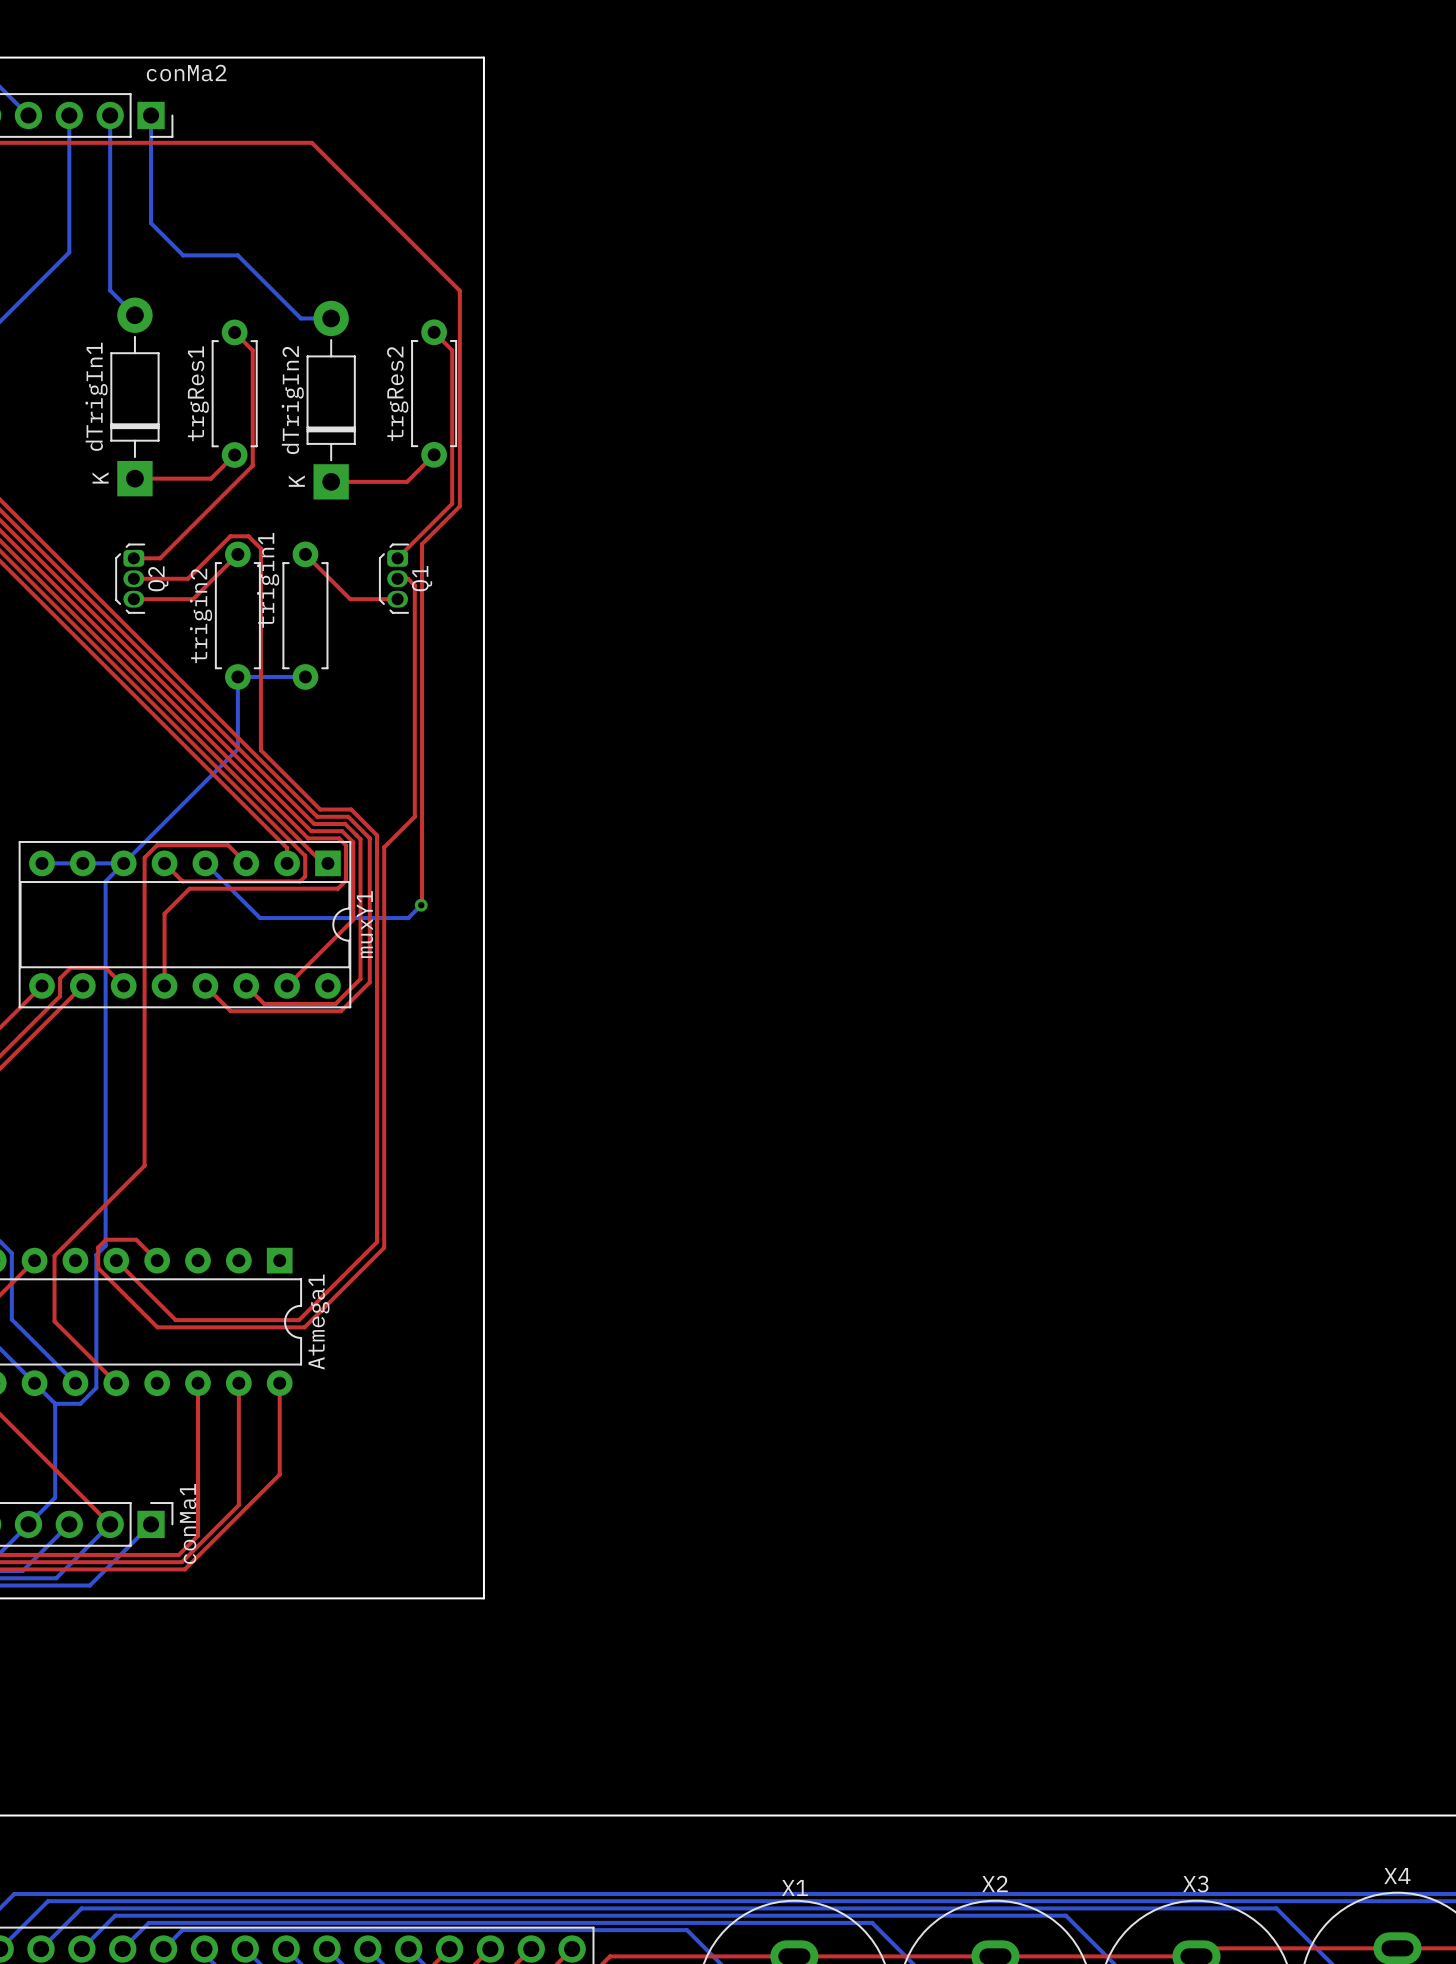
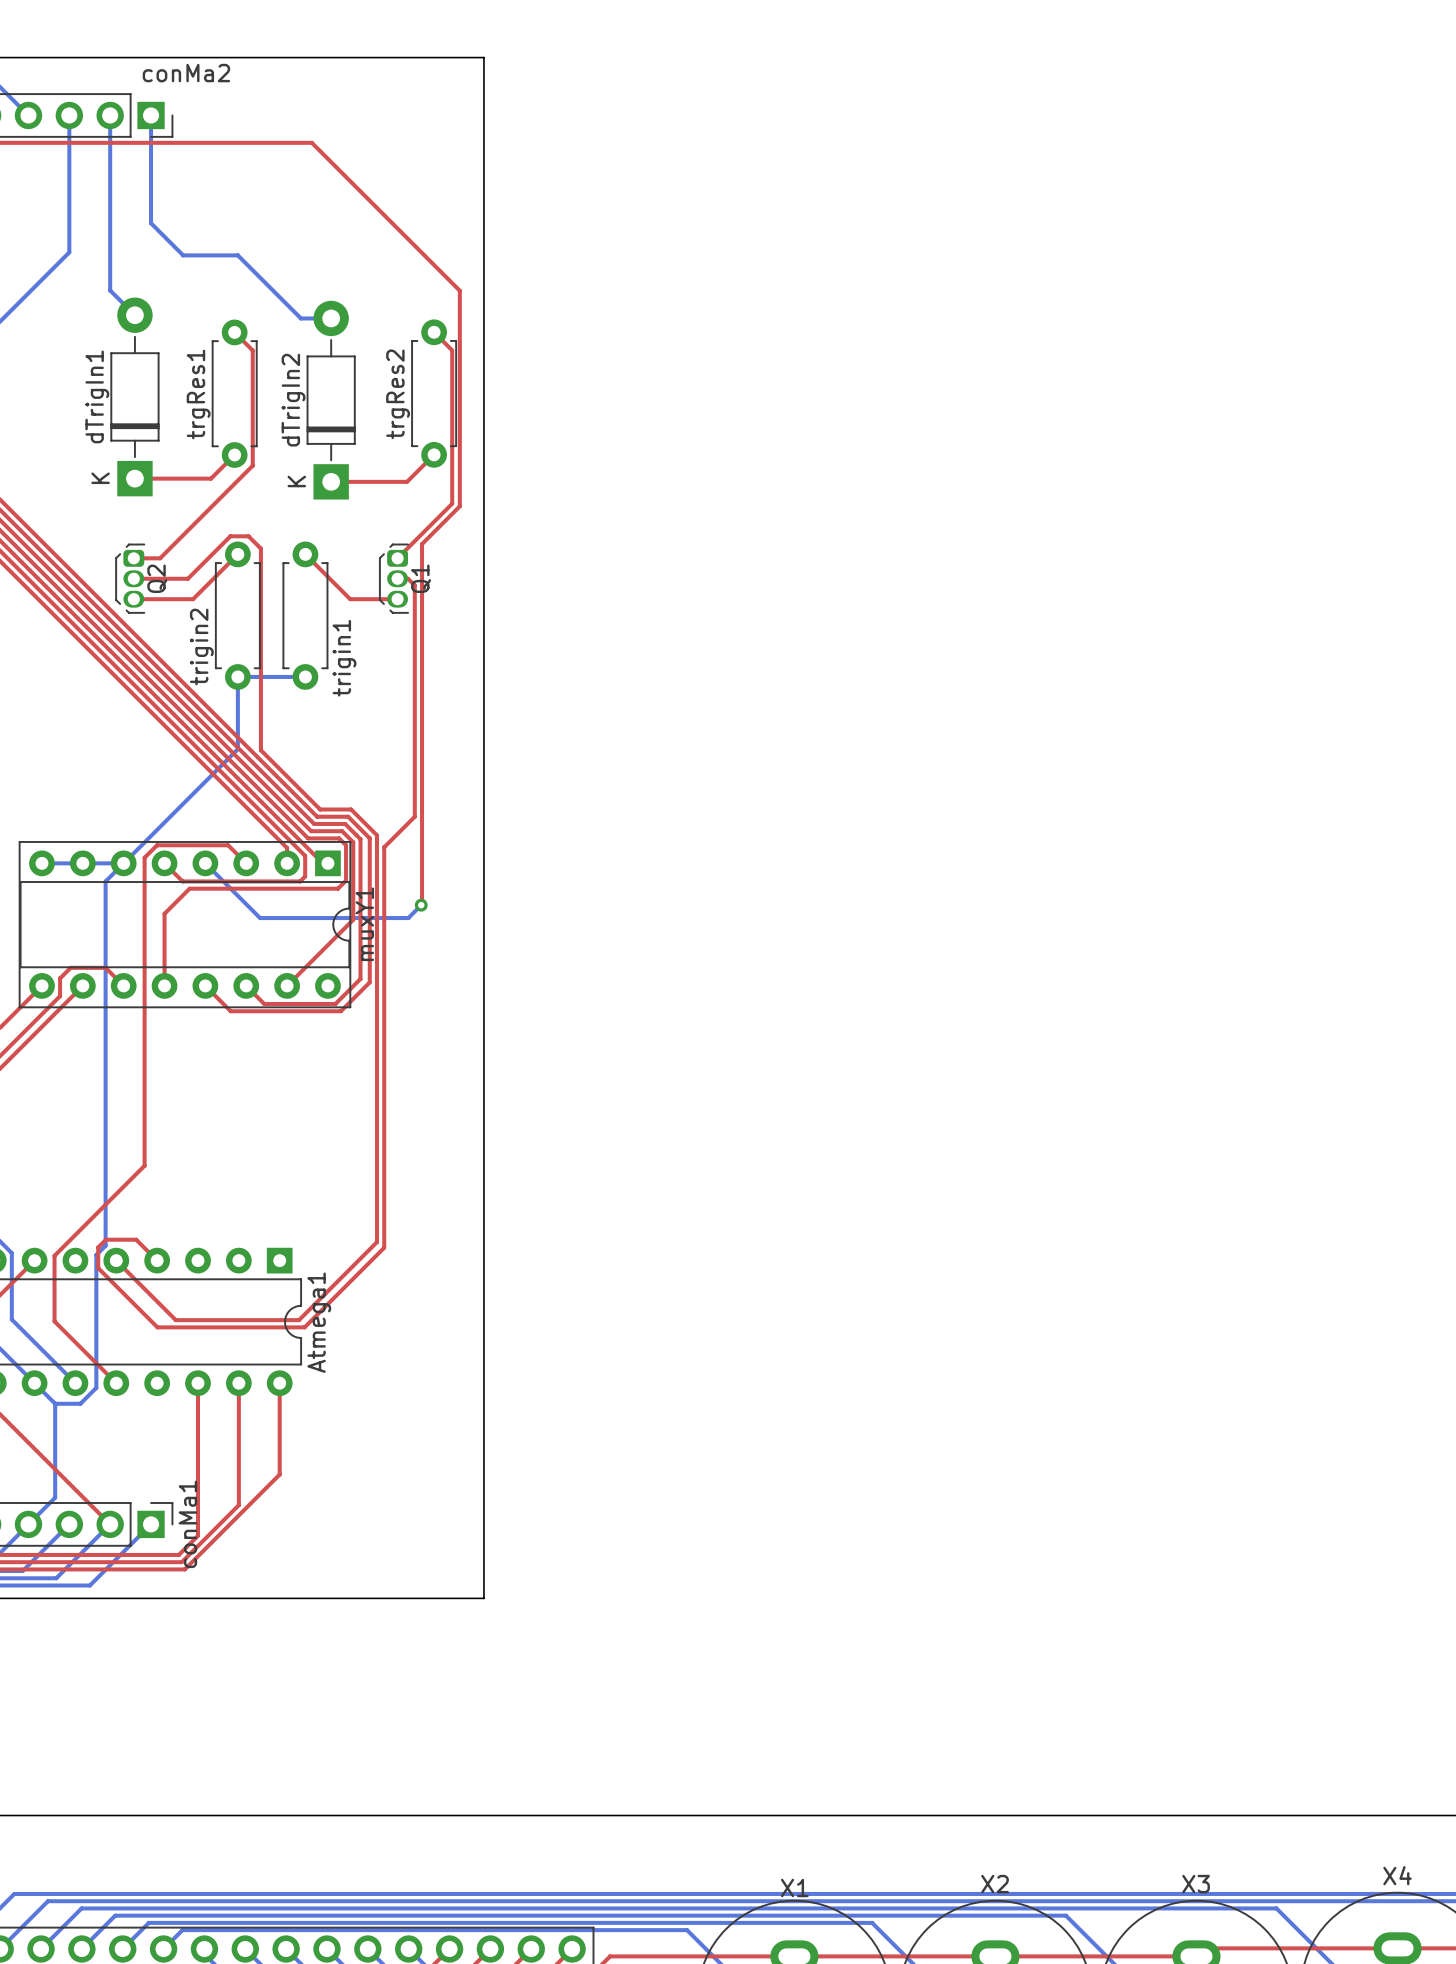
trigin1 name position: trigin1 (268, 580) -> trigin1 (344, 658)
trigin2 name position: trigin2 (201, 615) -> trigin2 (201, 647)

